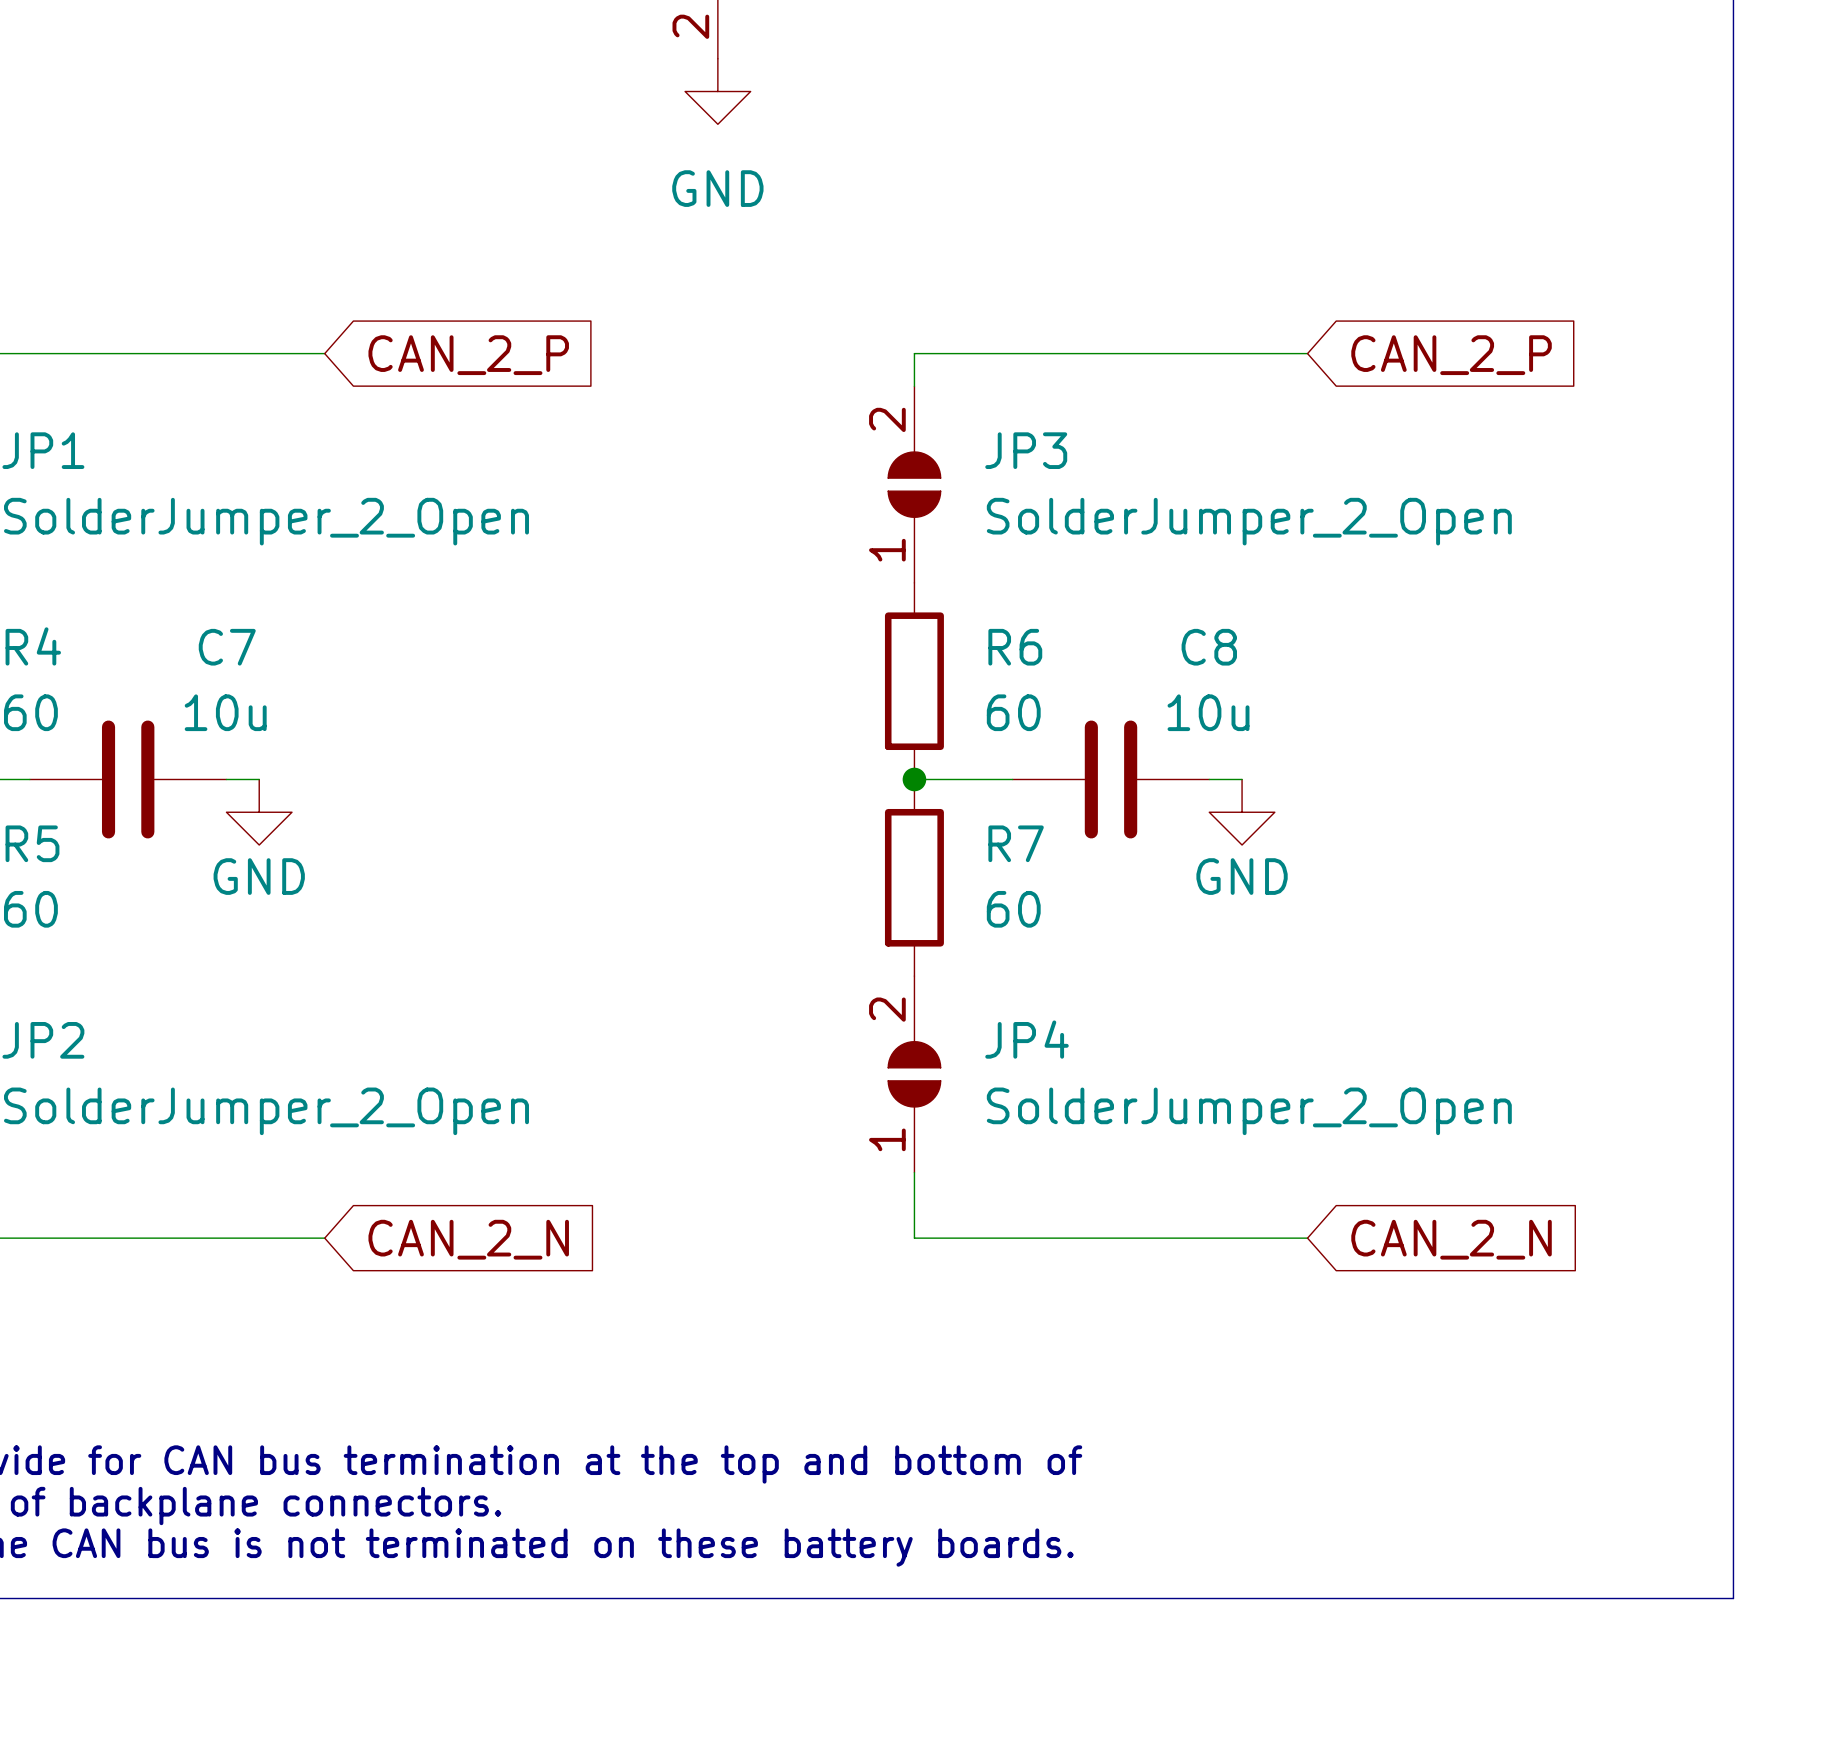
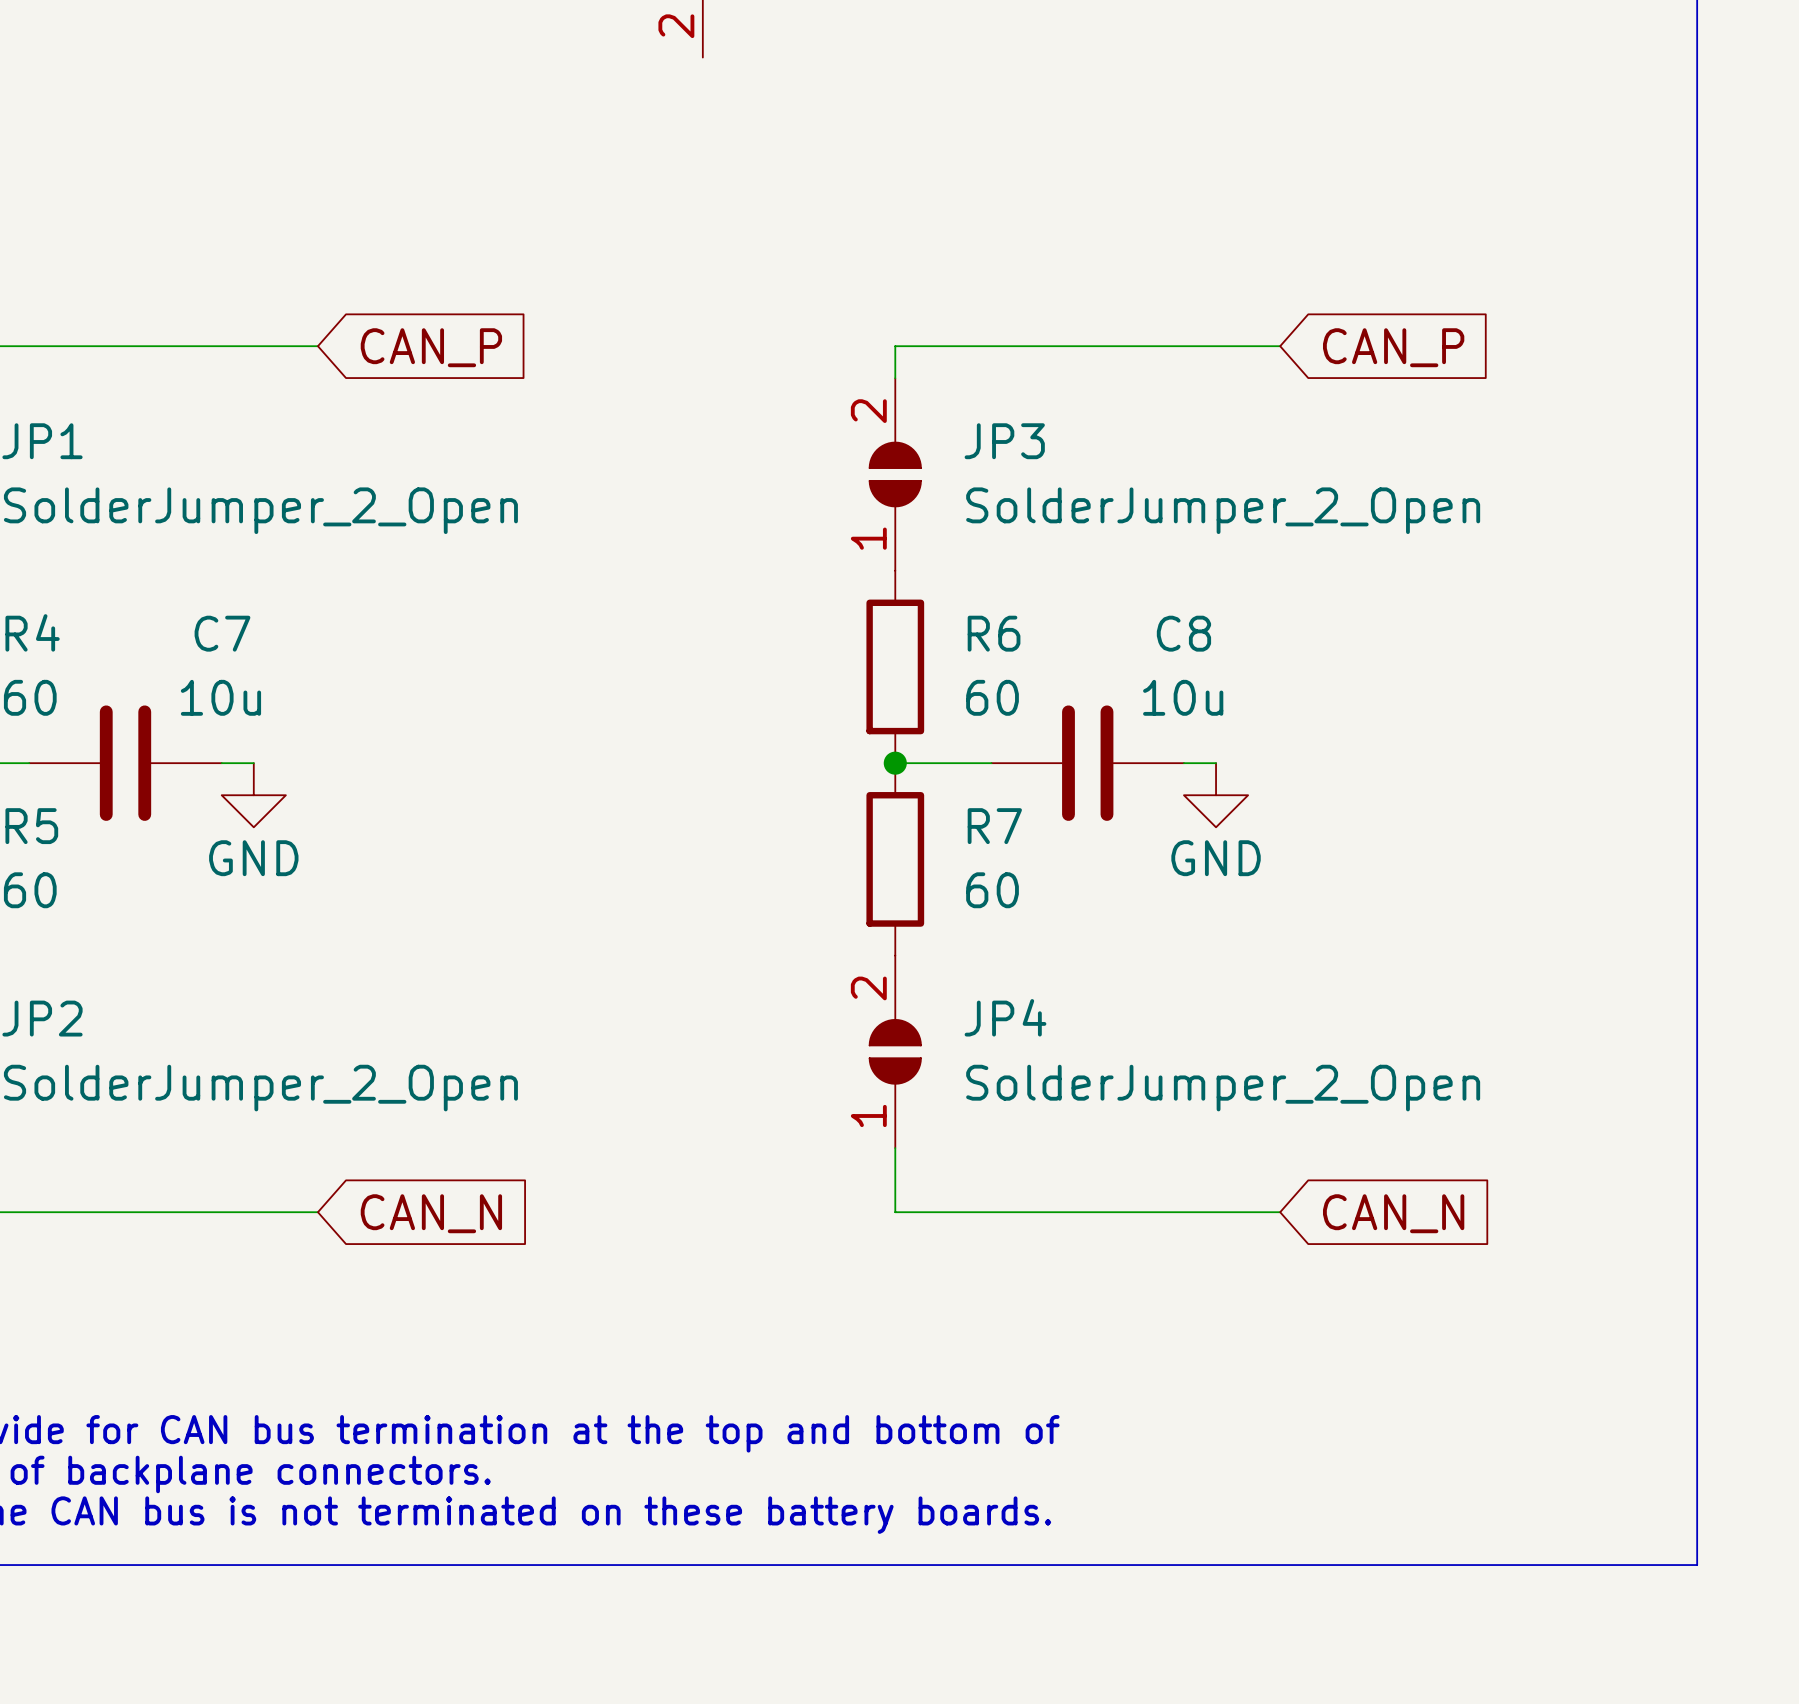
power symbol: GND (717, 91) -> none
global label: CAN_2_P (468, 355) -> CAN_P (431, 347)
global label: CAN_2_P (1451, 355) -> CAN_P (1393, 347)
global label: CAN_2_N (468, 1239) -> CAN_N (431, 1213)
global label: CAN_2_N (1451, 1239) -> CAN_N (1393, 1213)

